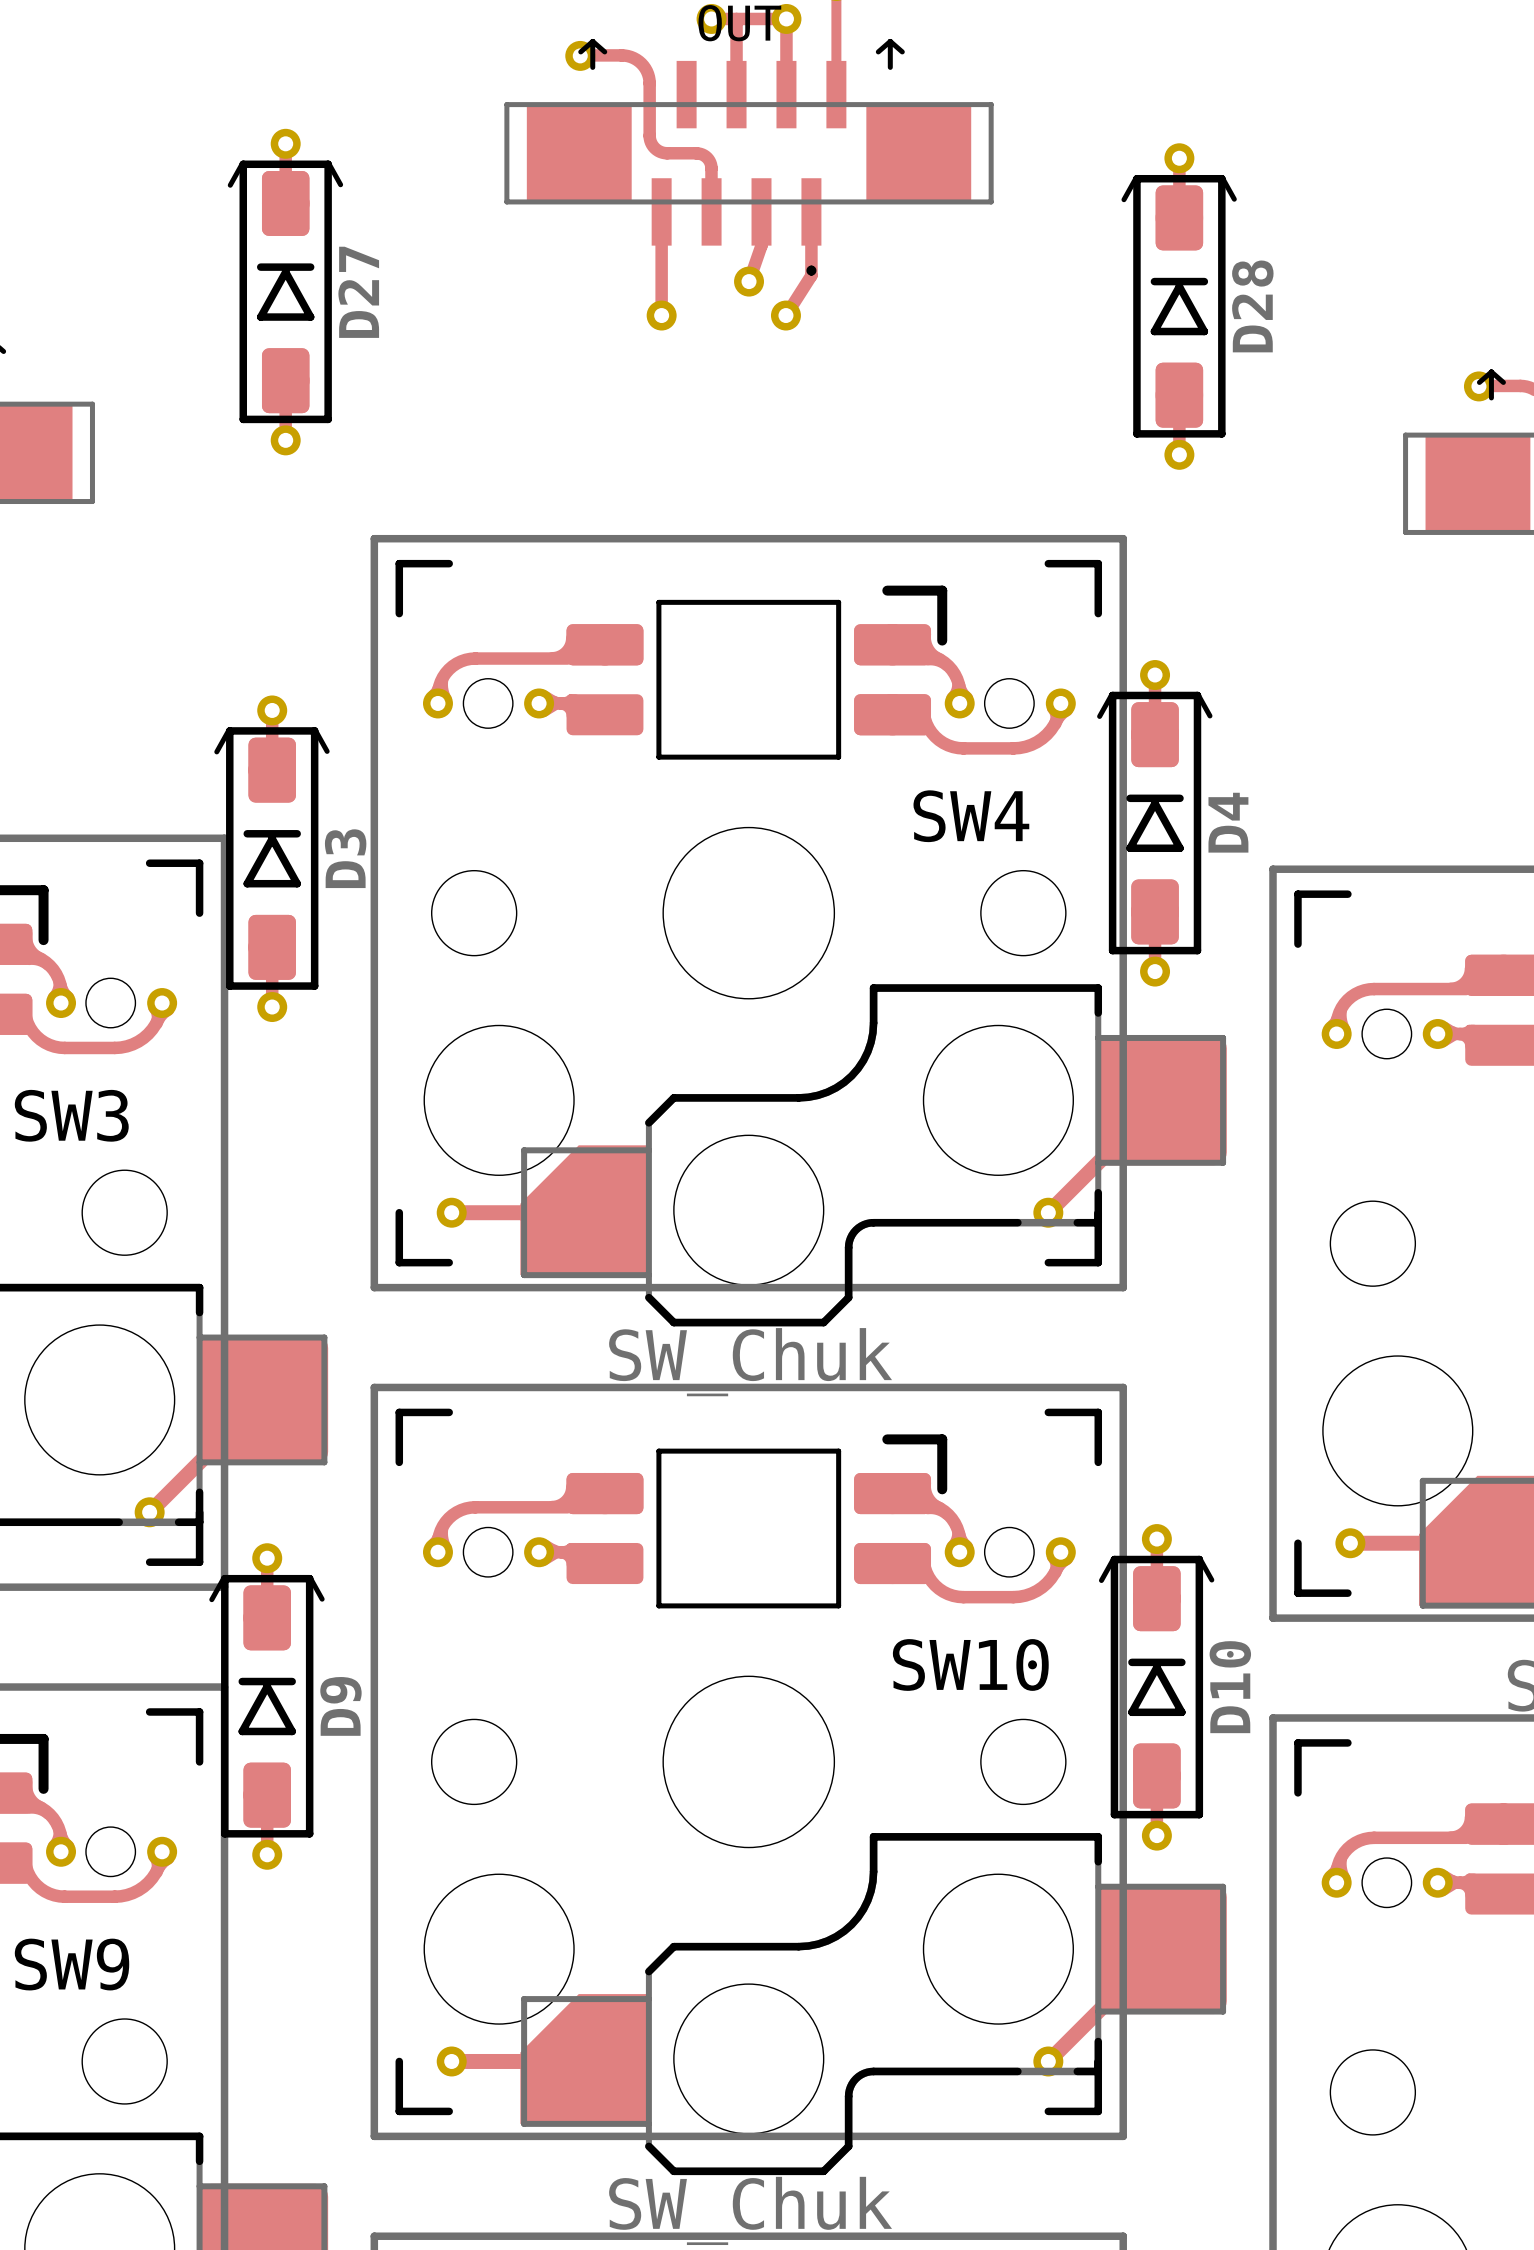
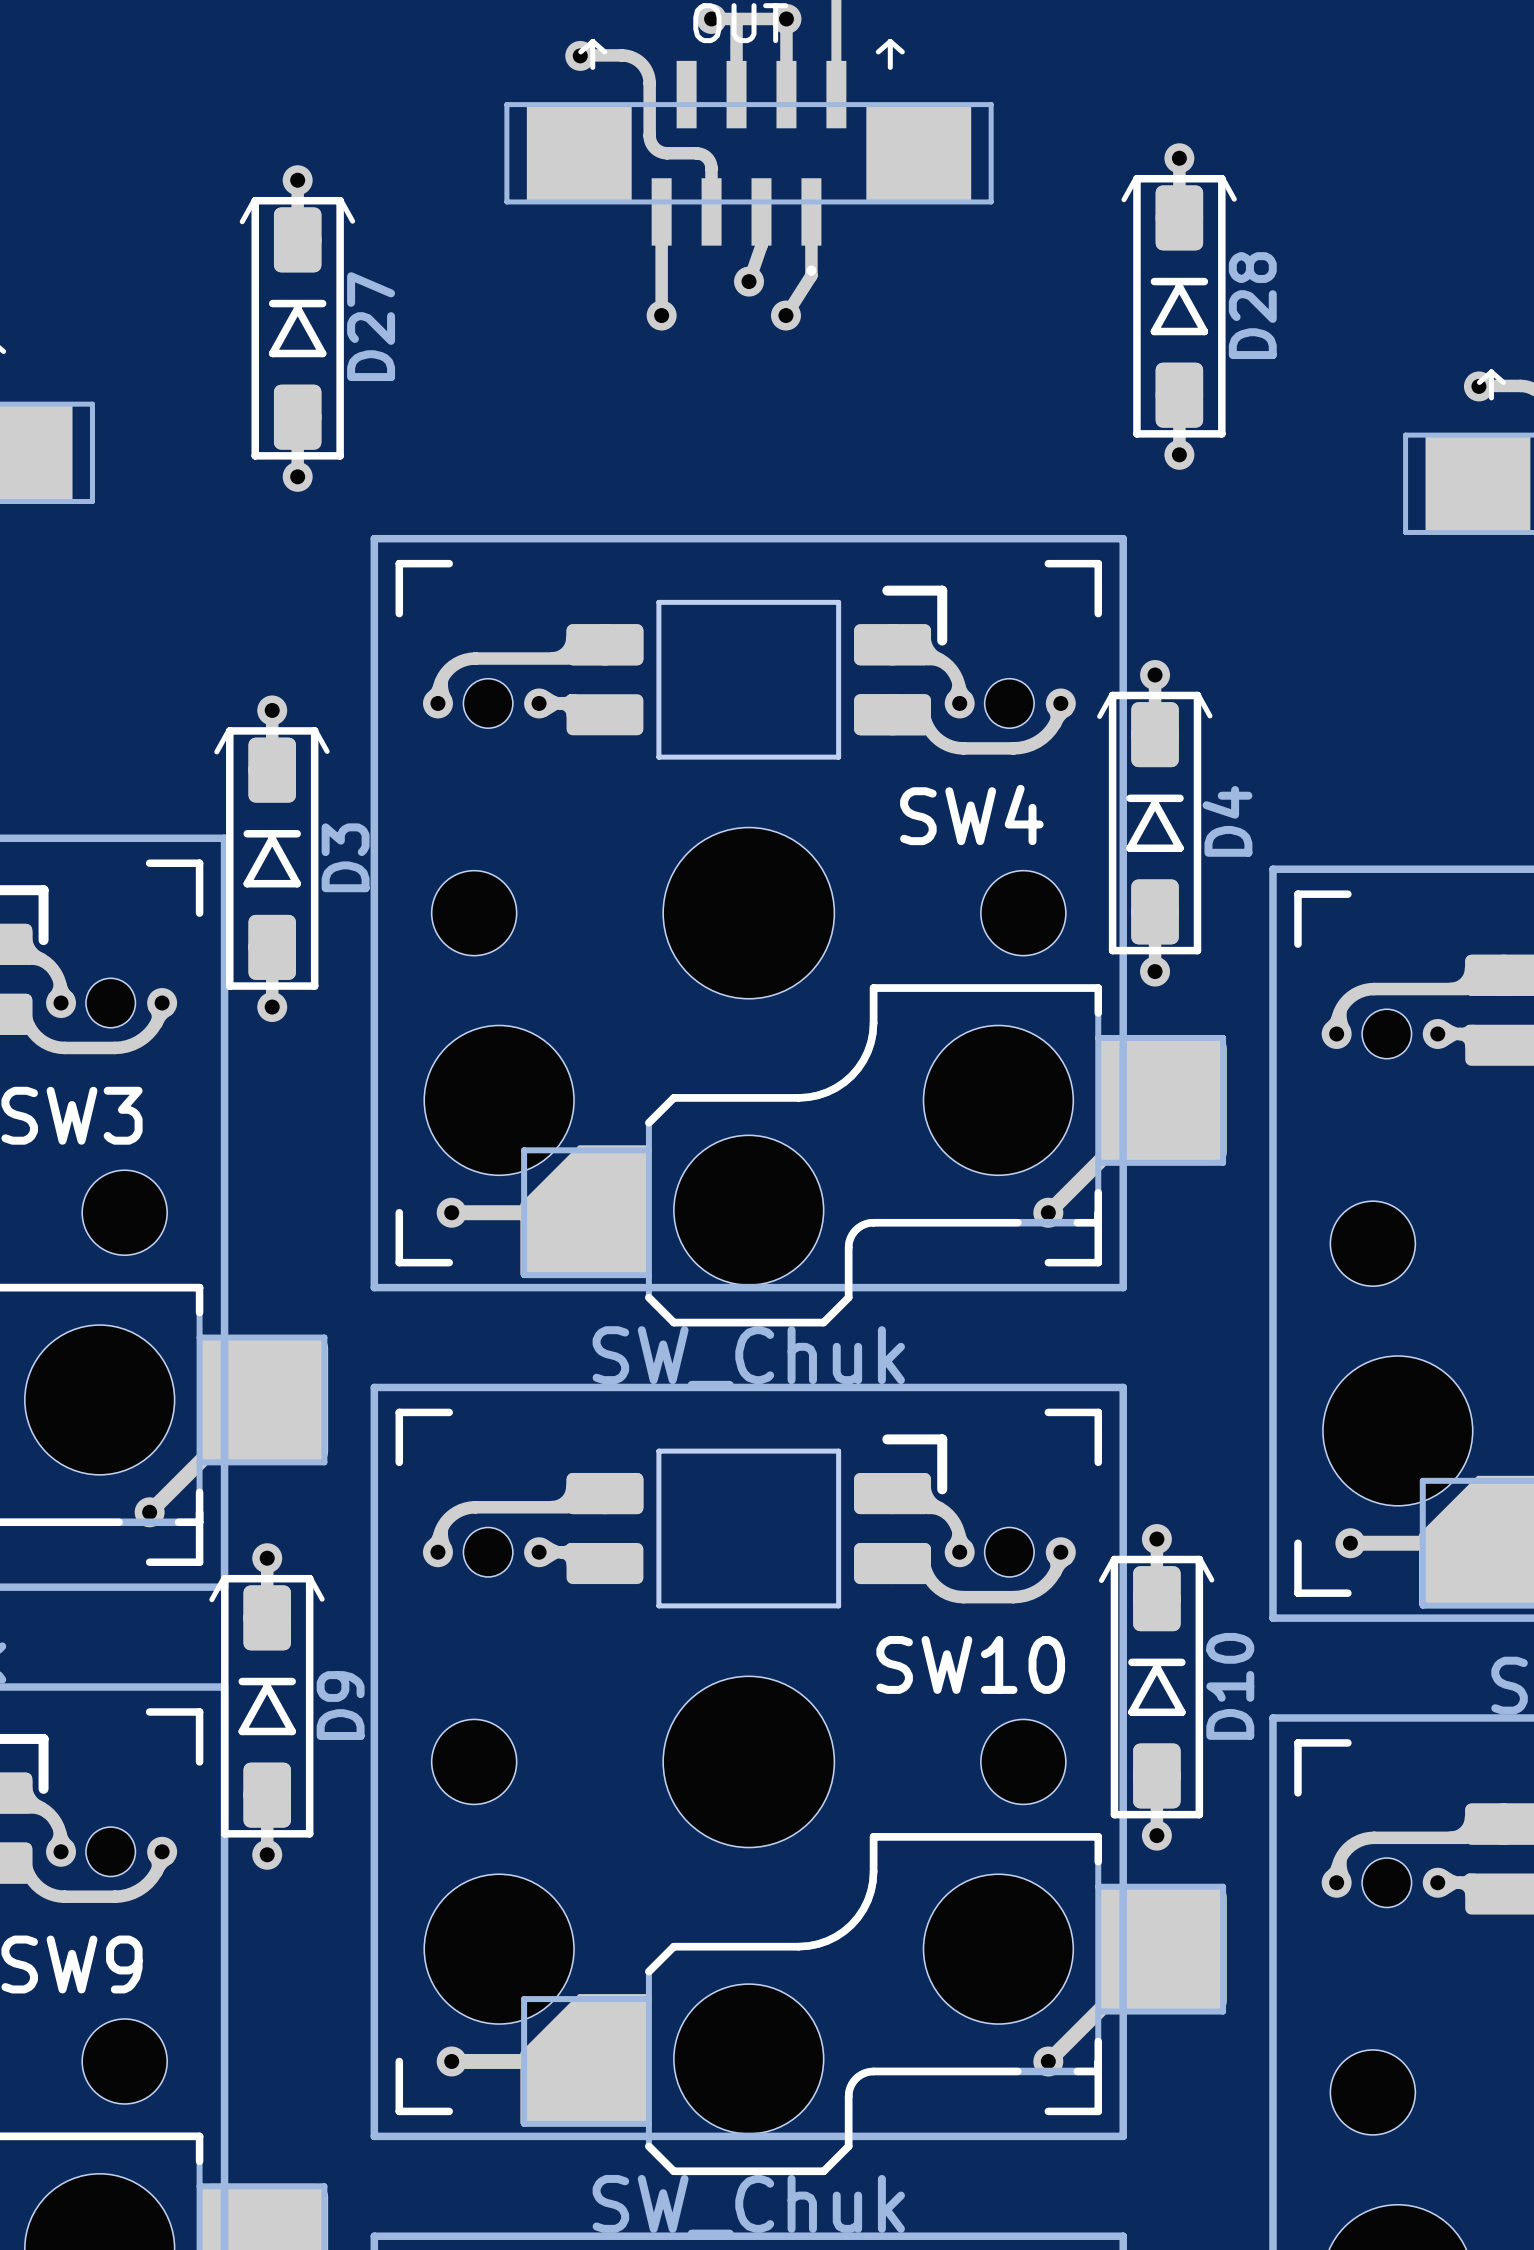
D27 position: (285, 292) -> (297, 328)

